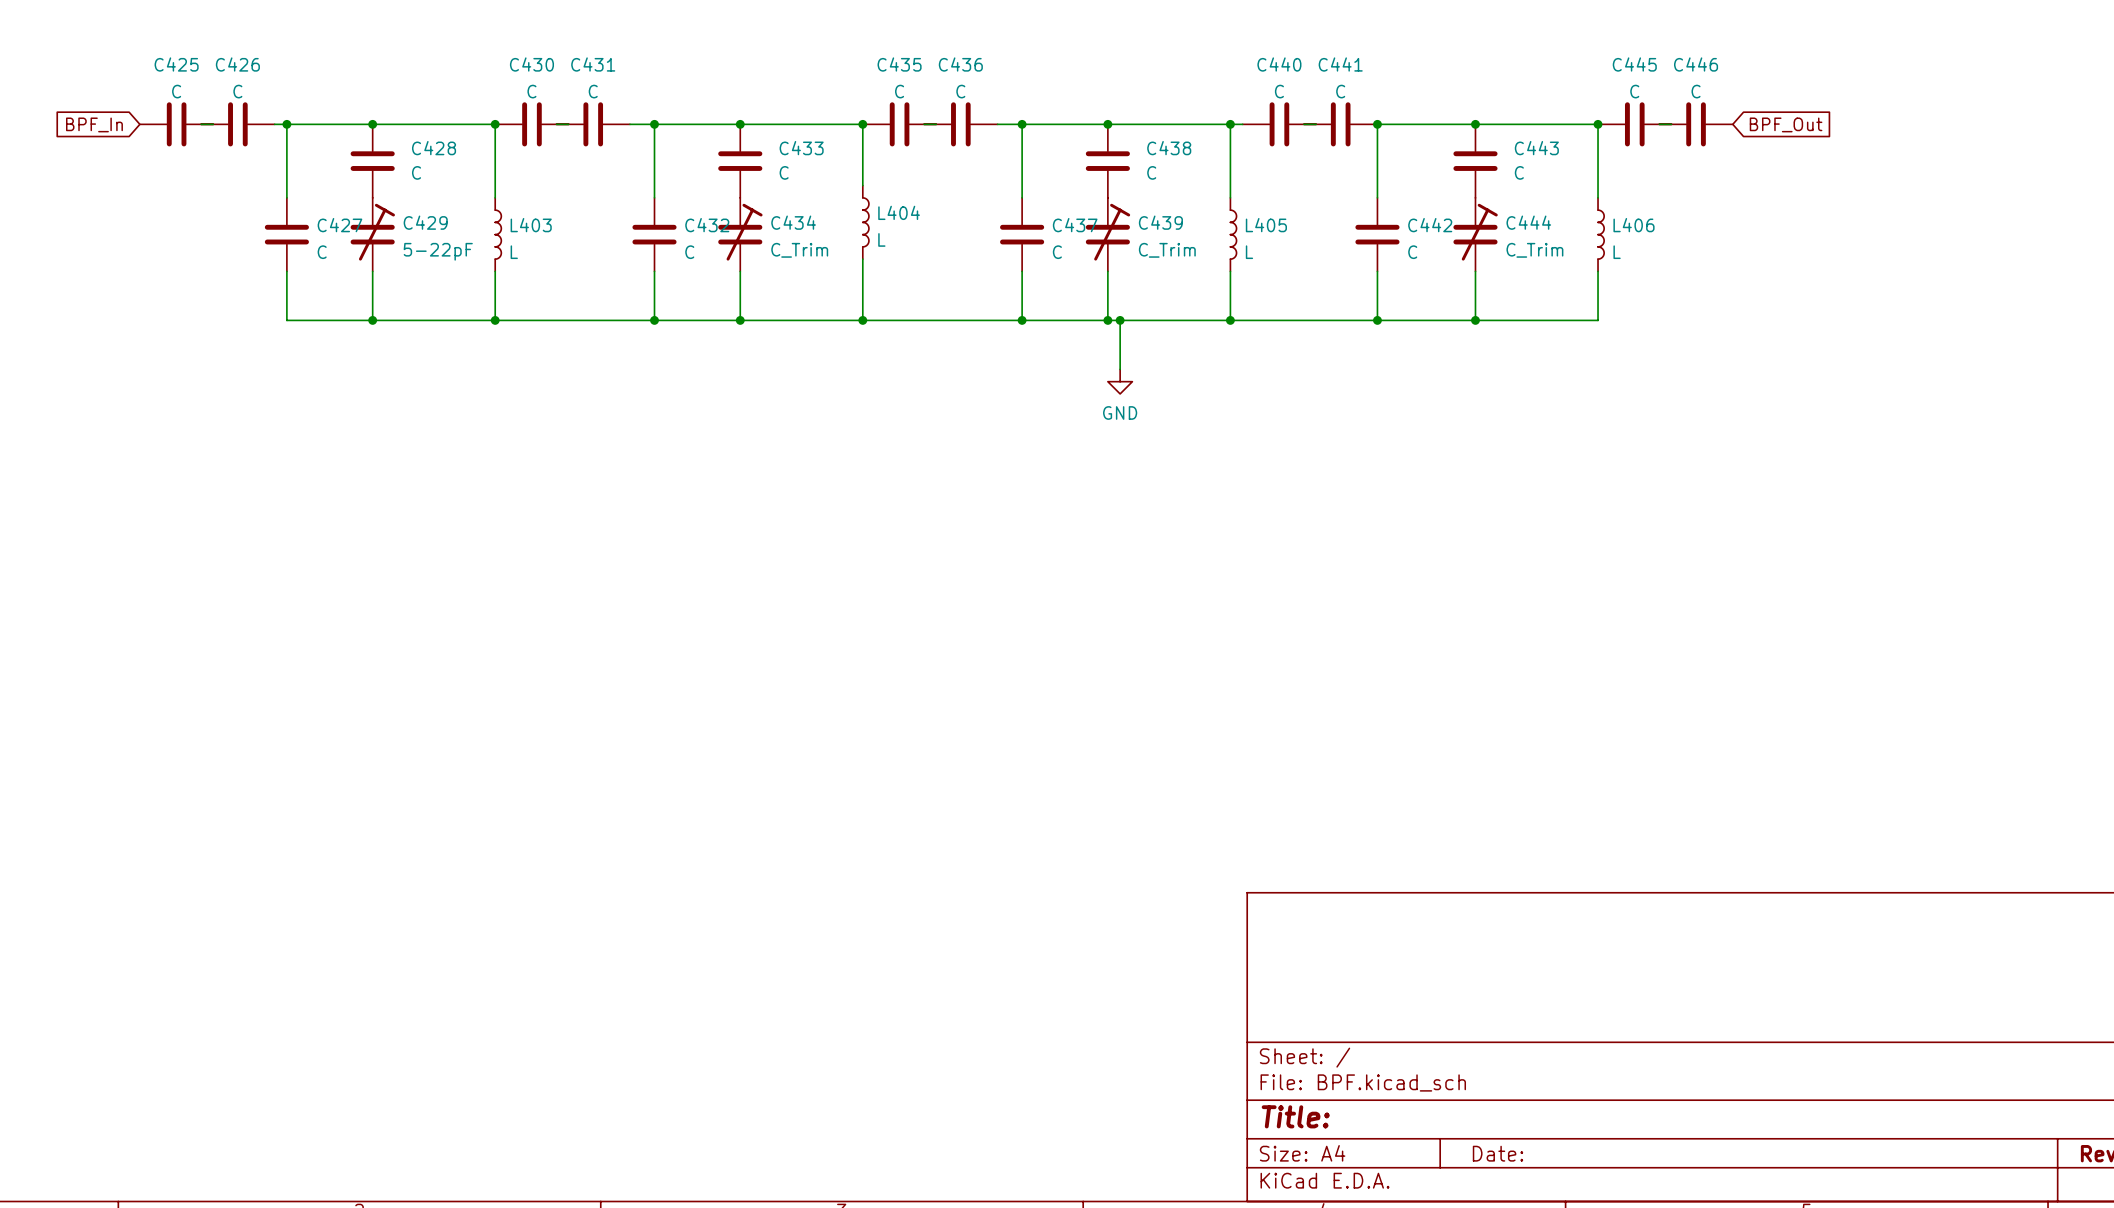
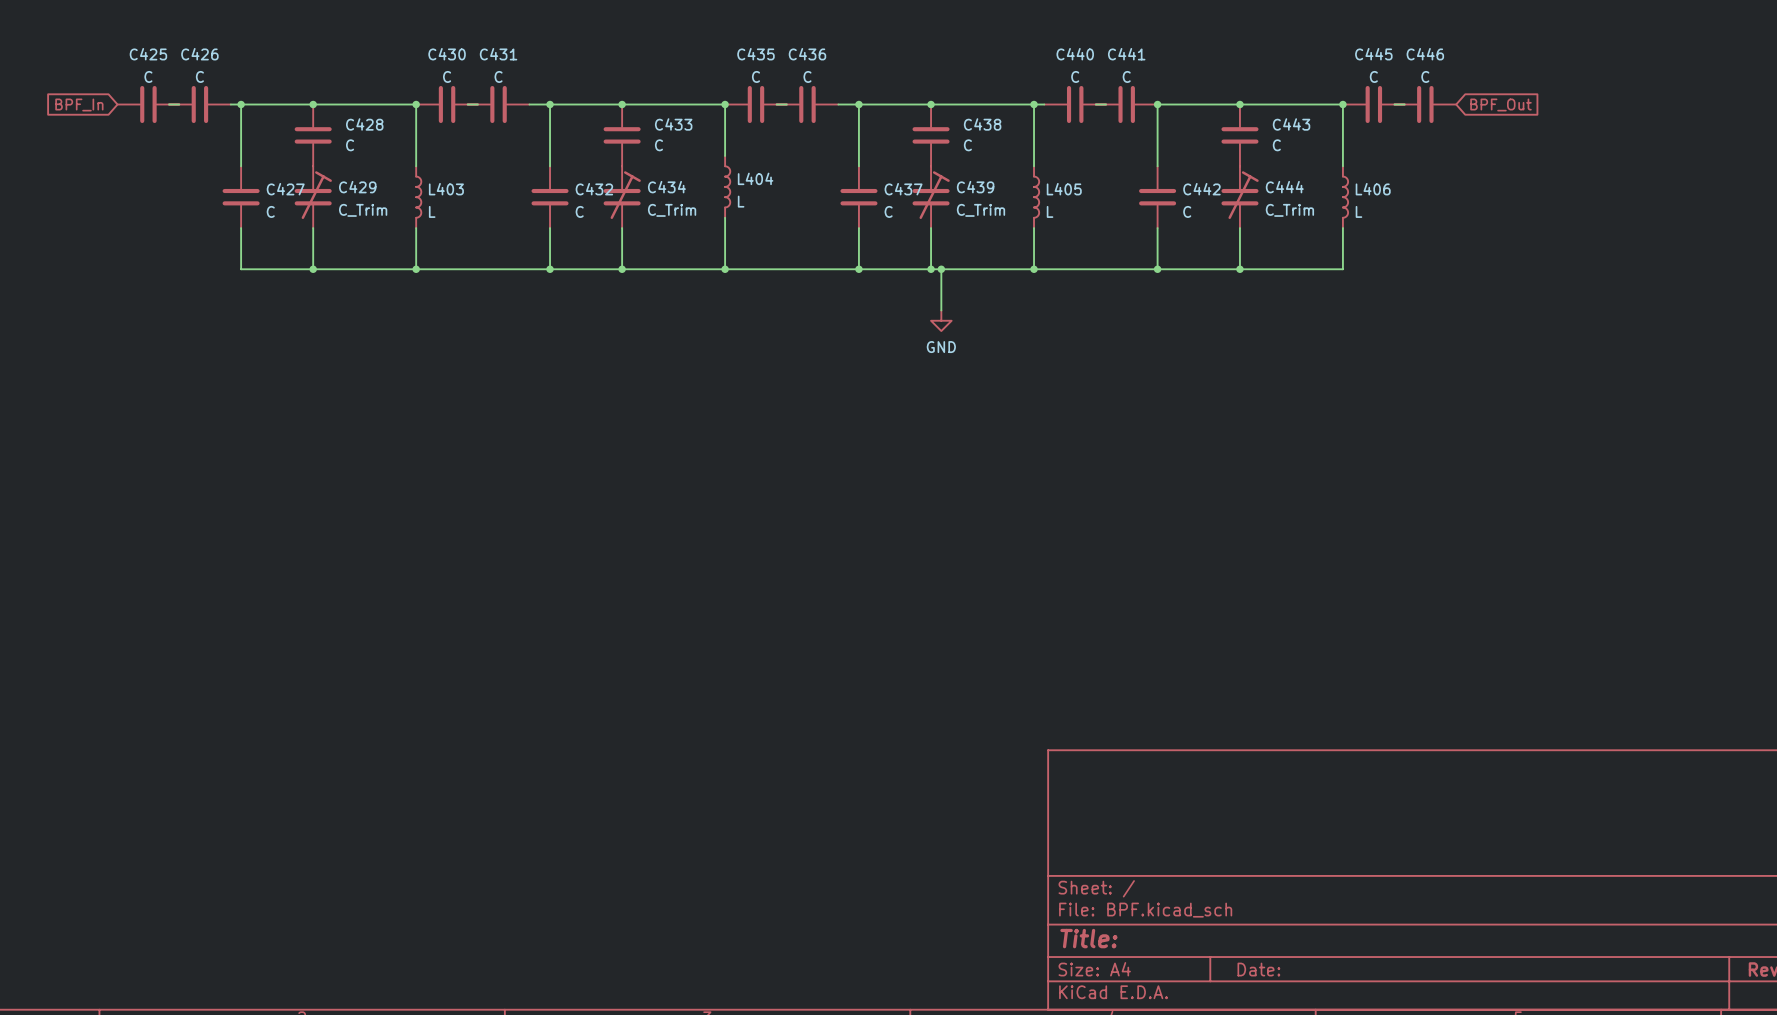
C429 value: 5-22pF (438, 251) -> C_Trim (363, 210)

